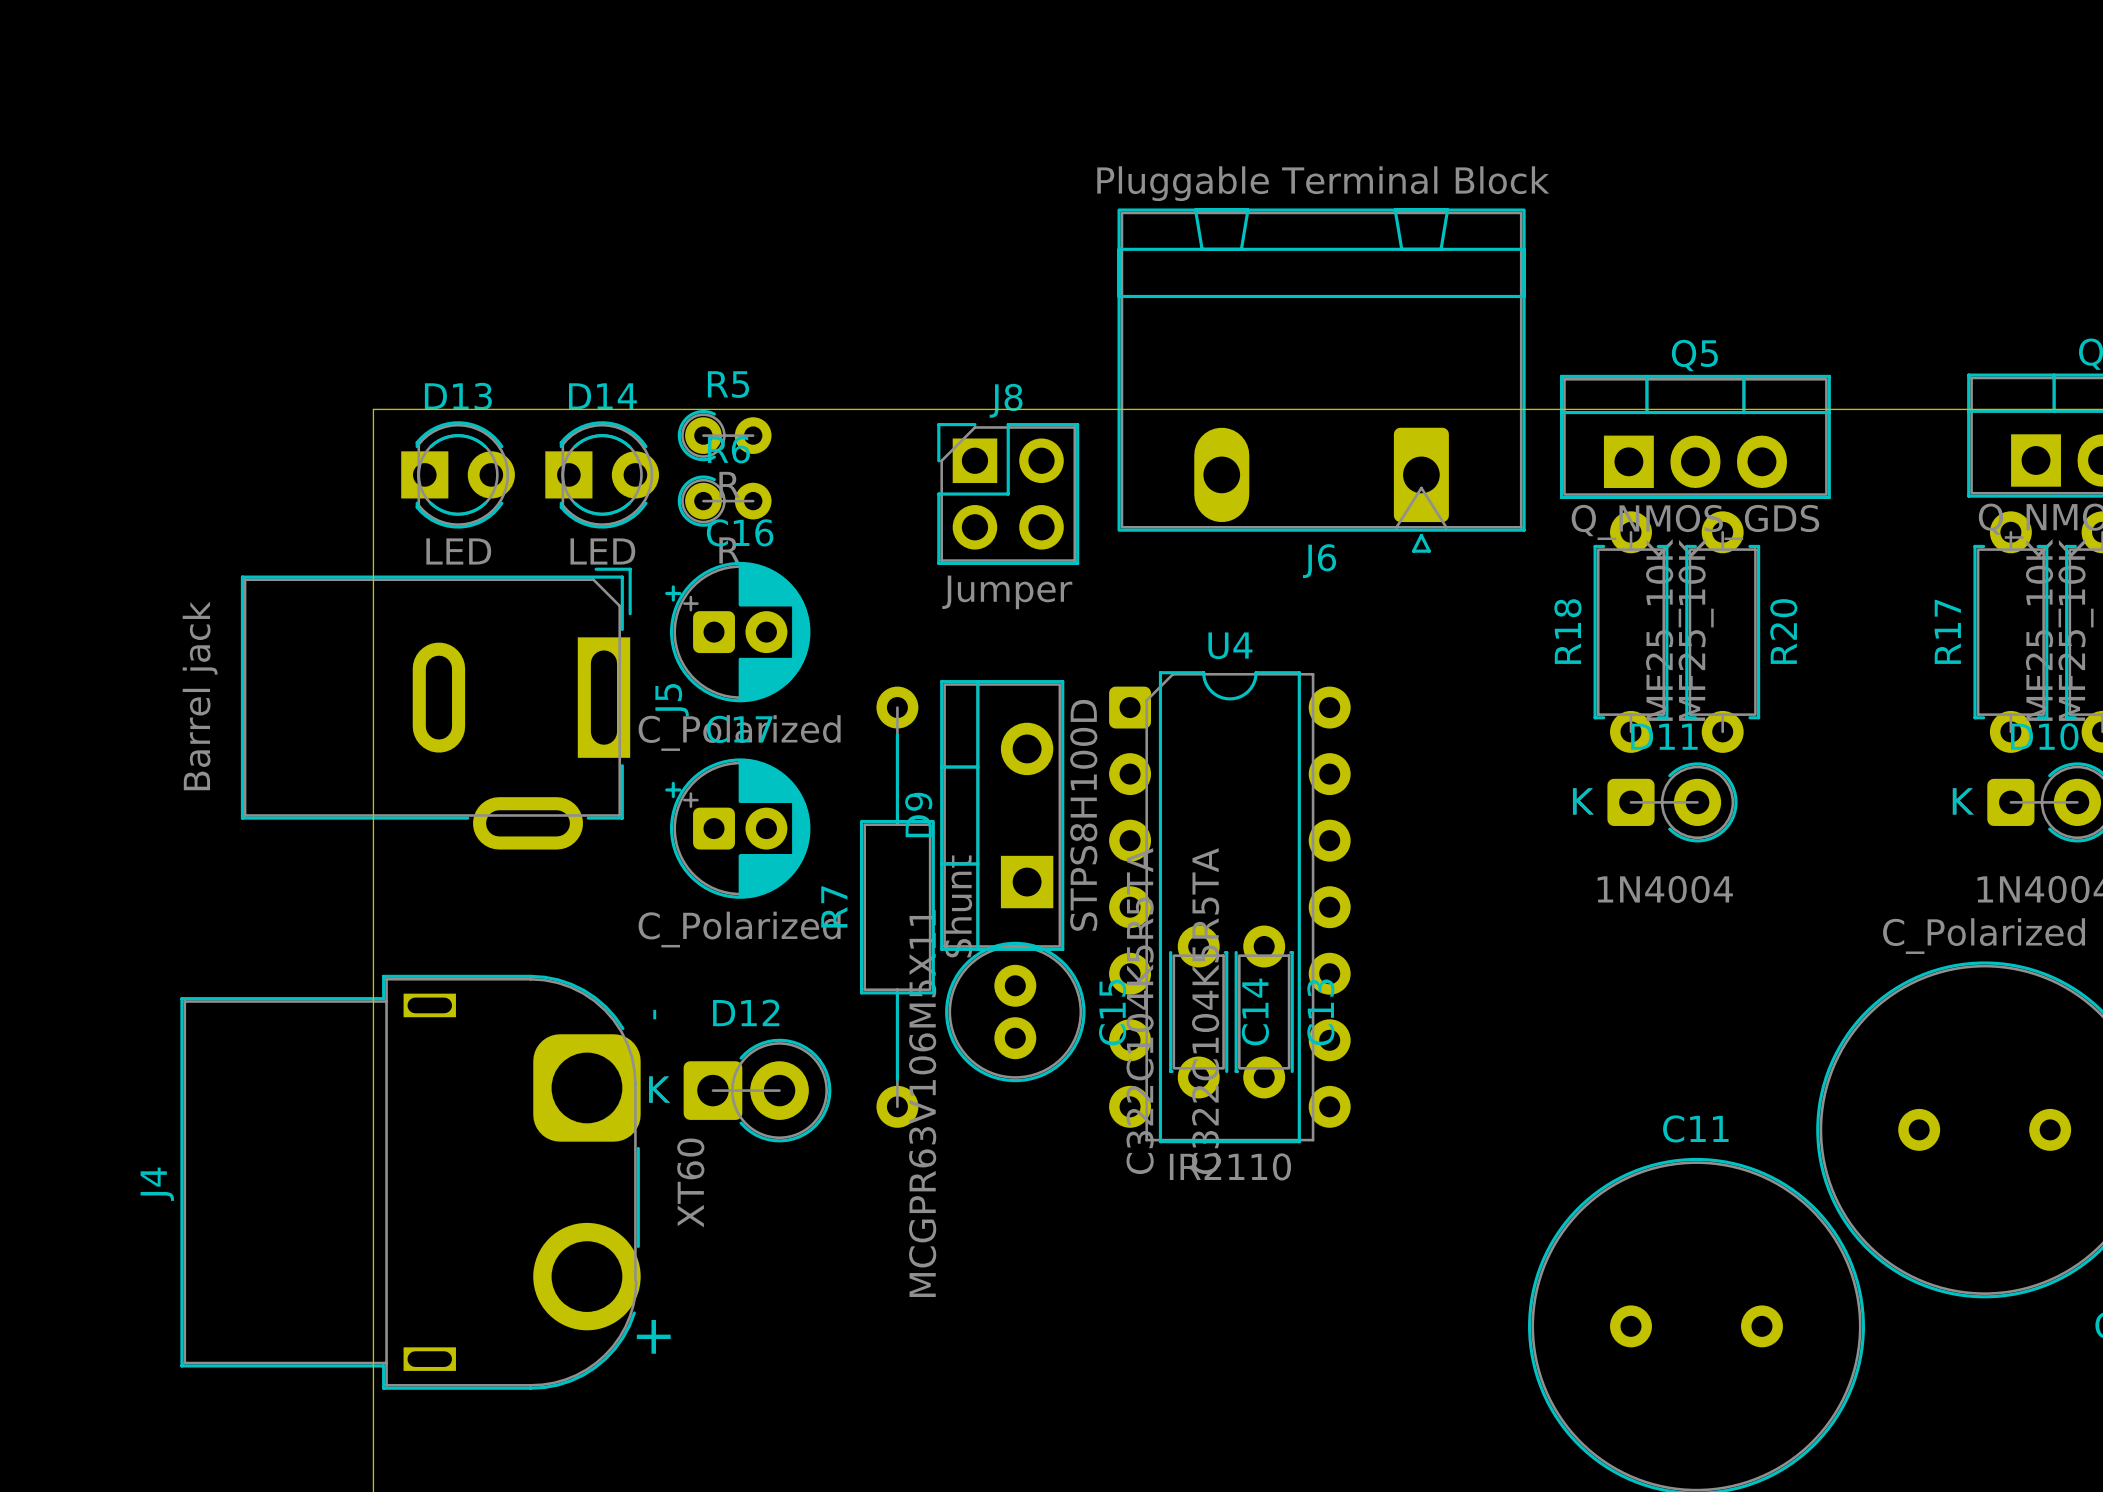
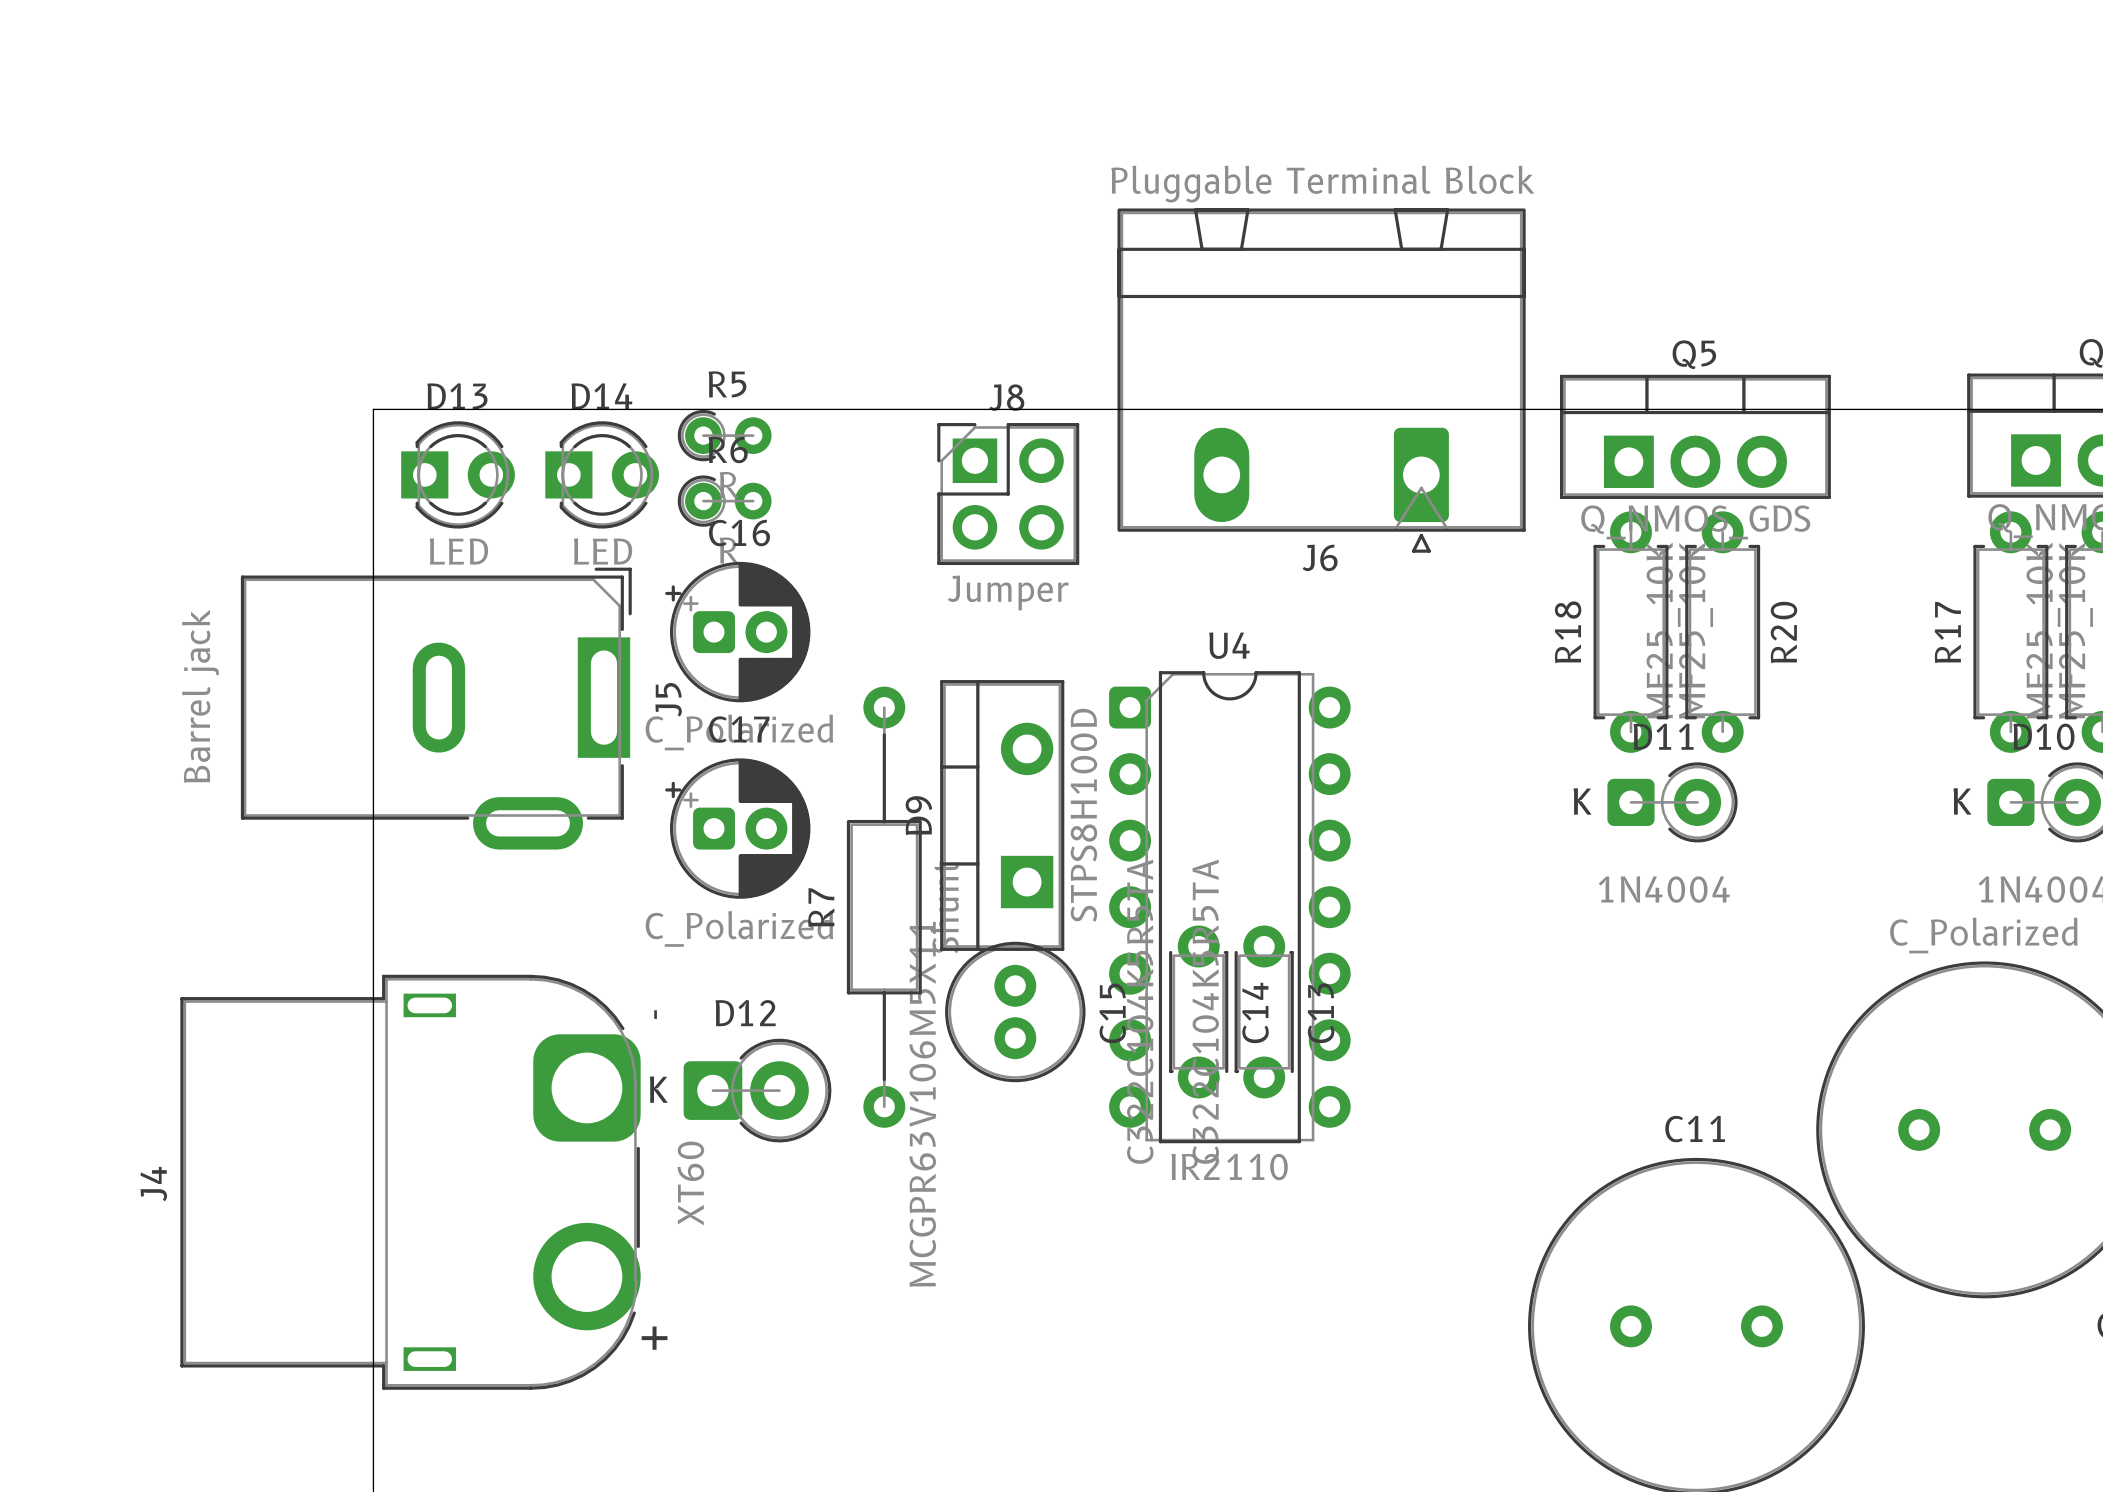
R7 position: (897, 907) -> (884, 907)

